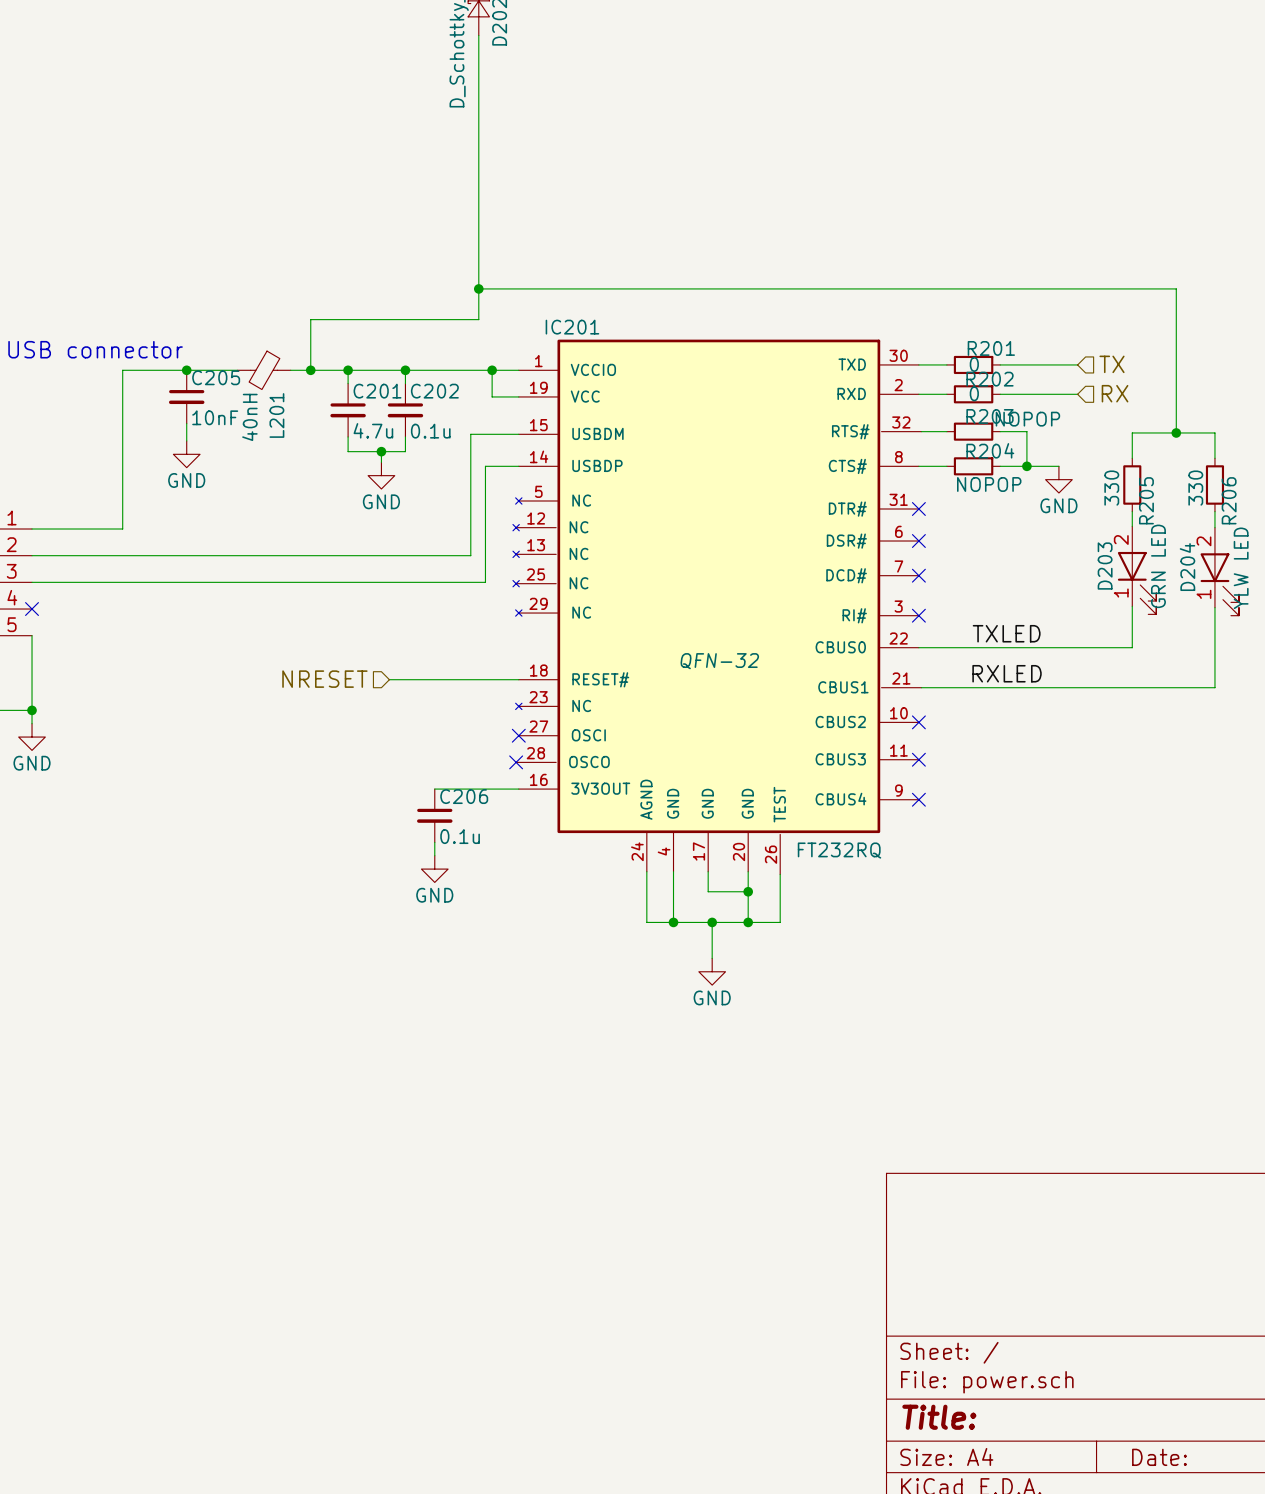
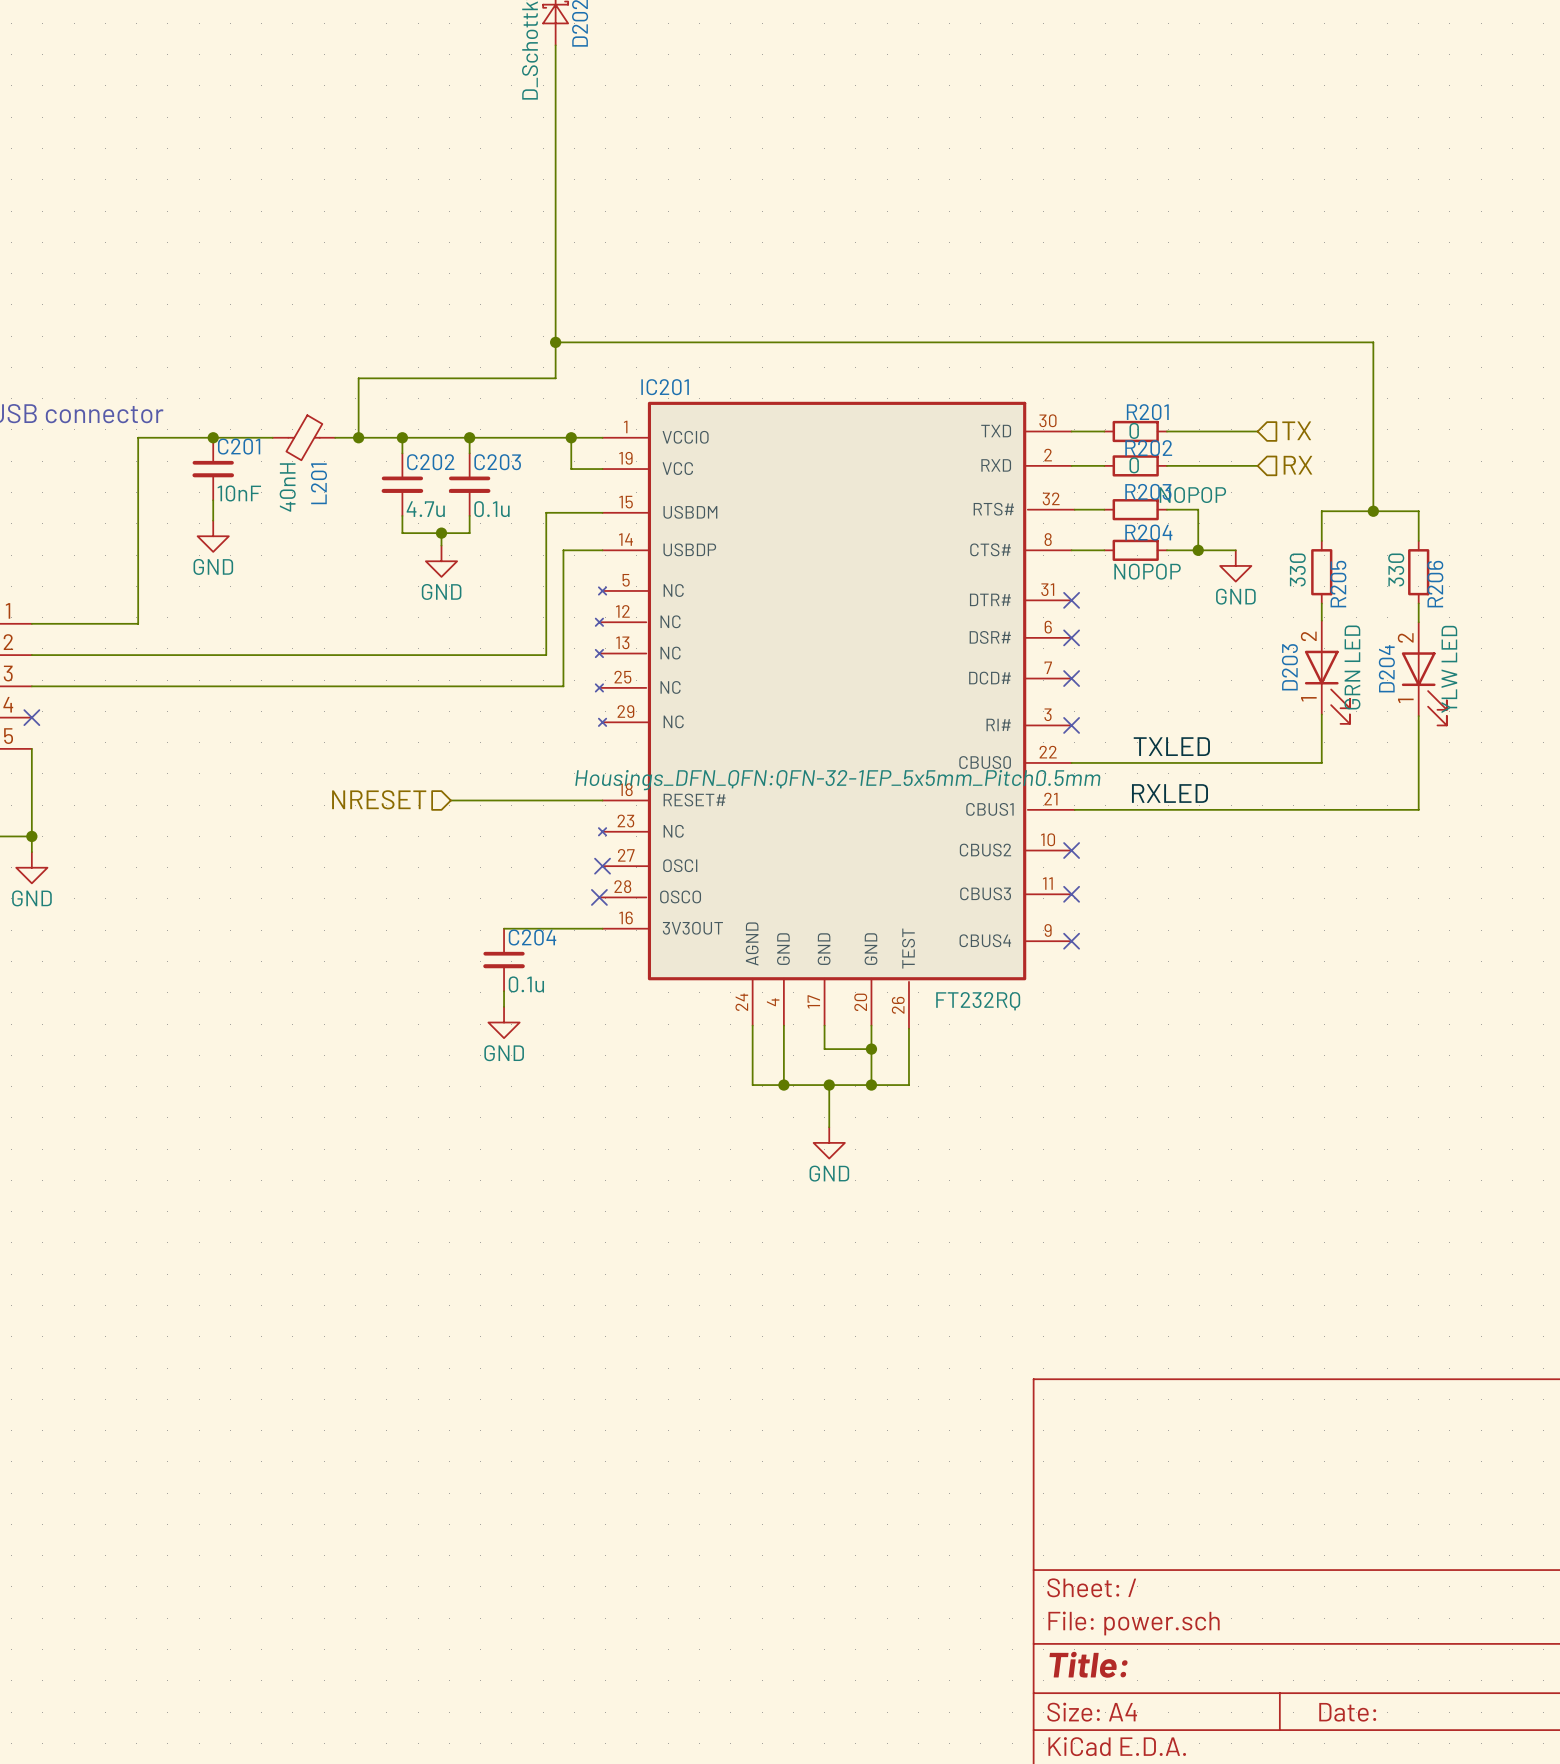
C205 name: C205 (216, 377) -> C201 (239, 446)
C201 name: C201 (377, 391) -> C202 (430, 462)
C202 name: C202 (434, 391) -> C203 (497, 462)
IC201 text: QFN-32 (719, 661) -> Housings_DFN_QFN:QFN-32-1EP_5x5mm_Pitch0.5mm (837, 780)
C206 name: C206 (464, 796) -> C204 (532, 937)

